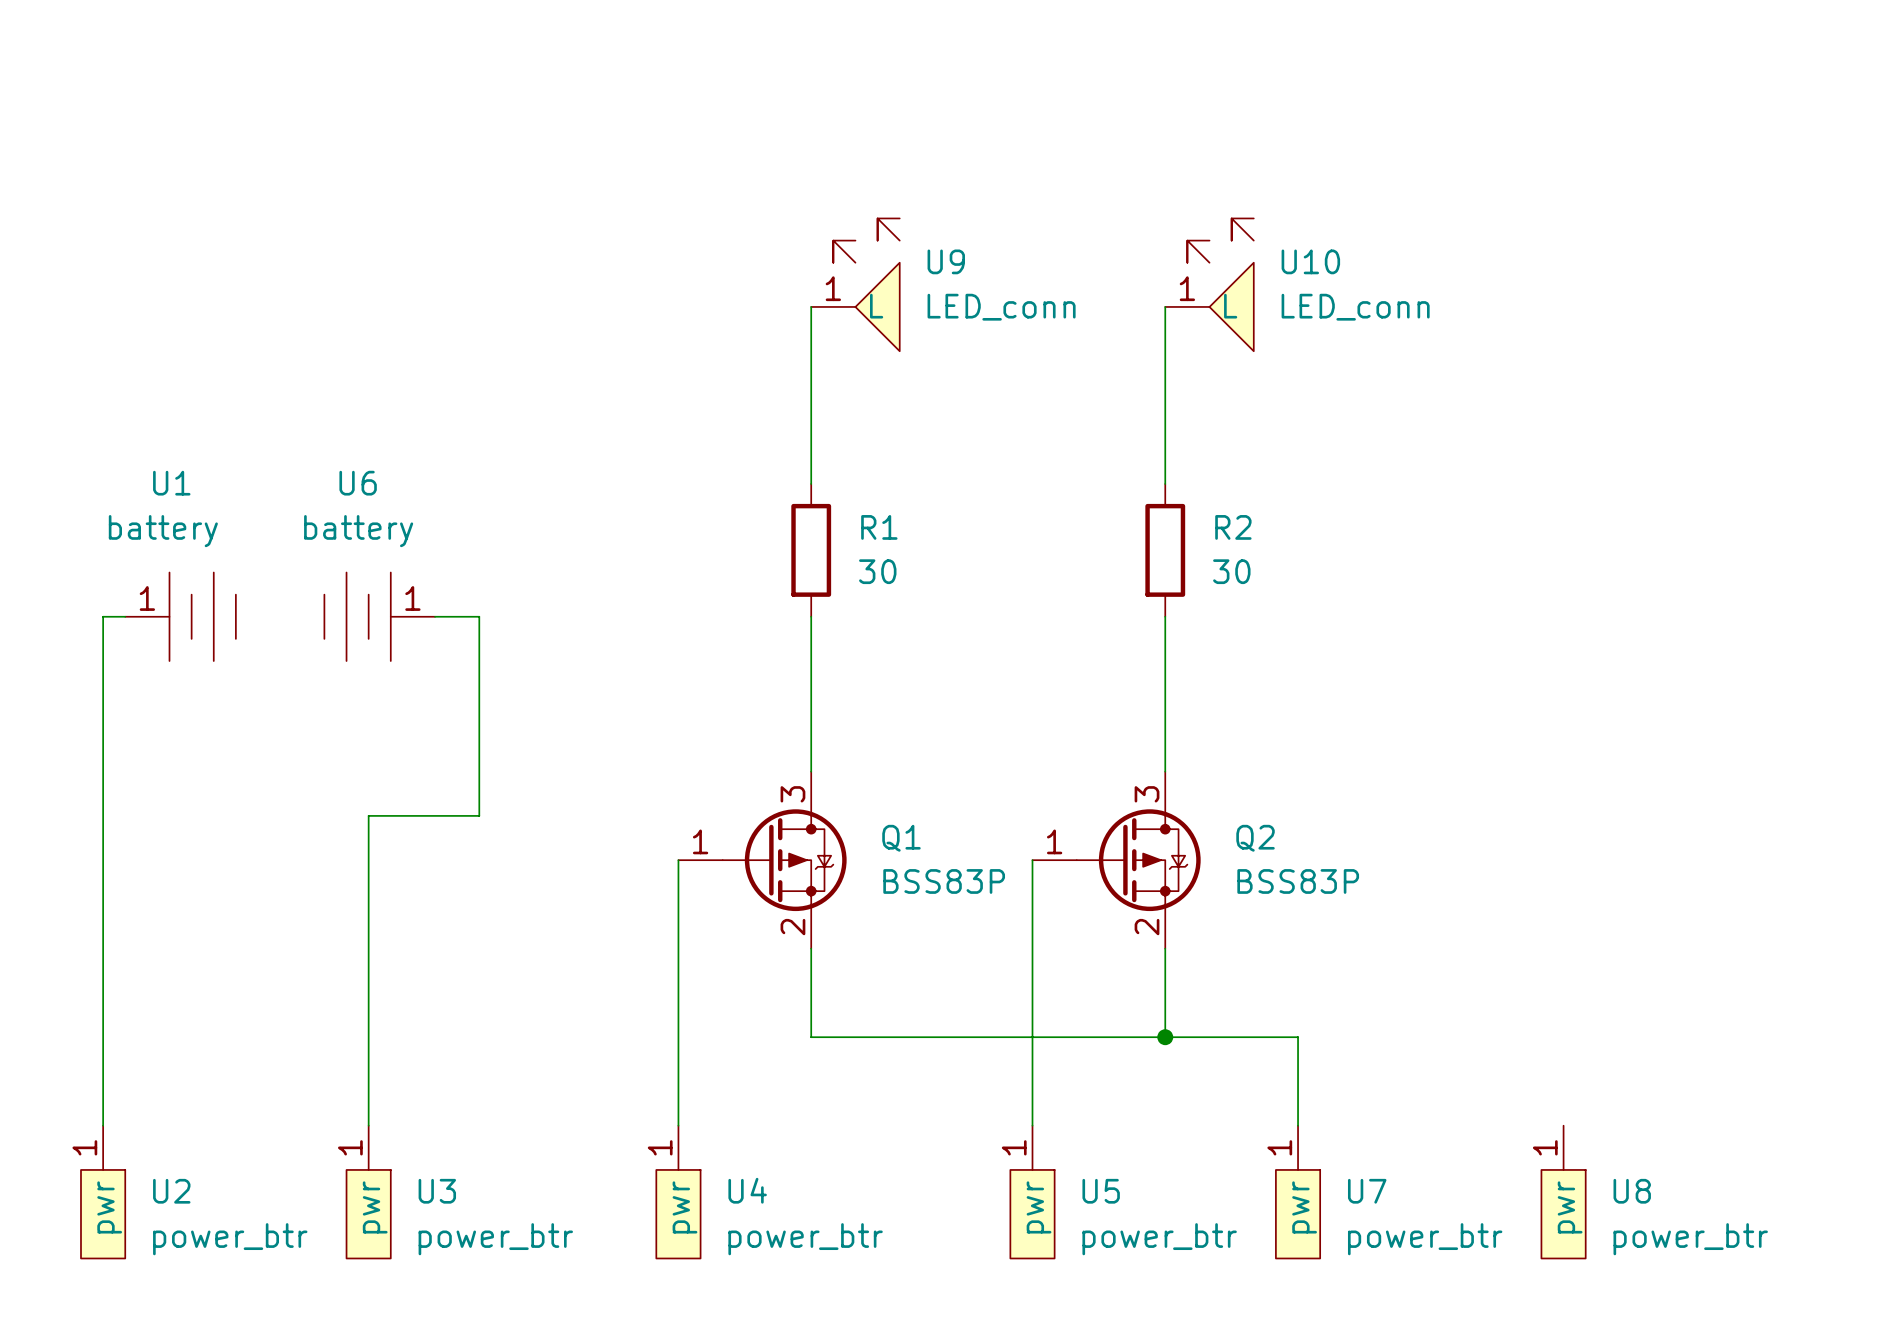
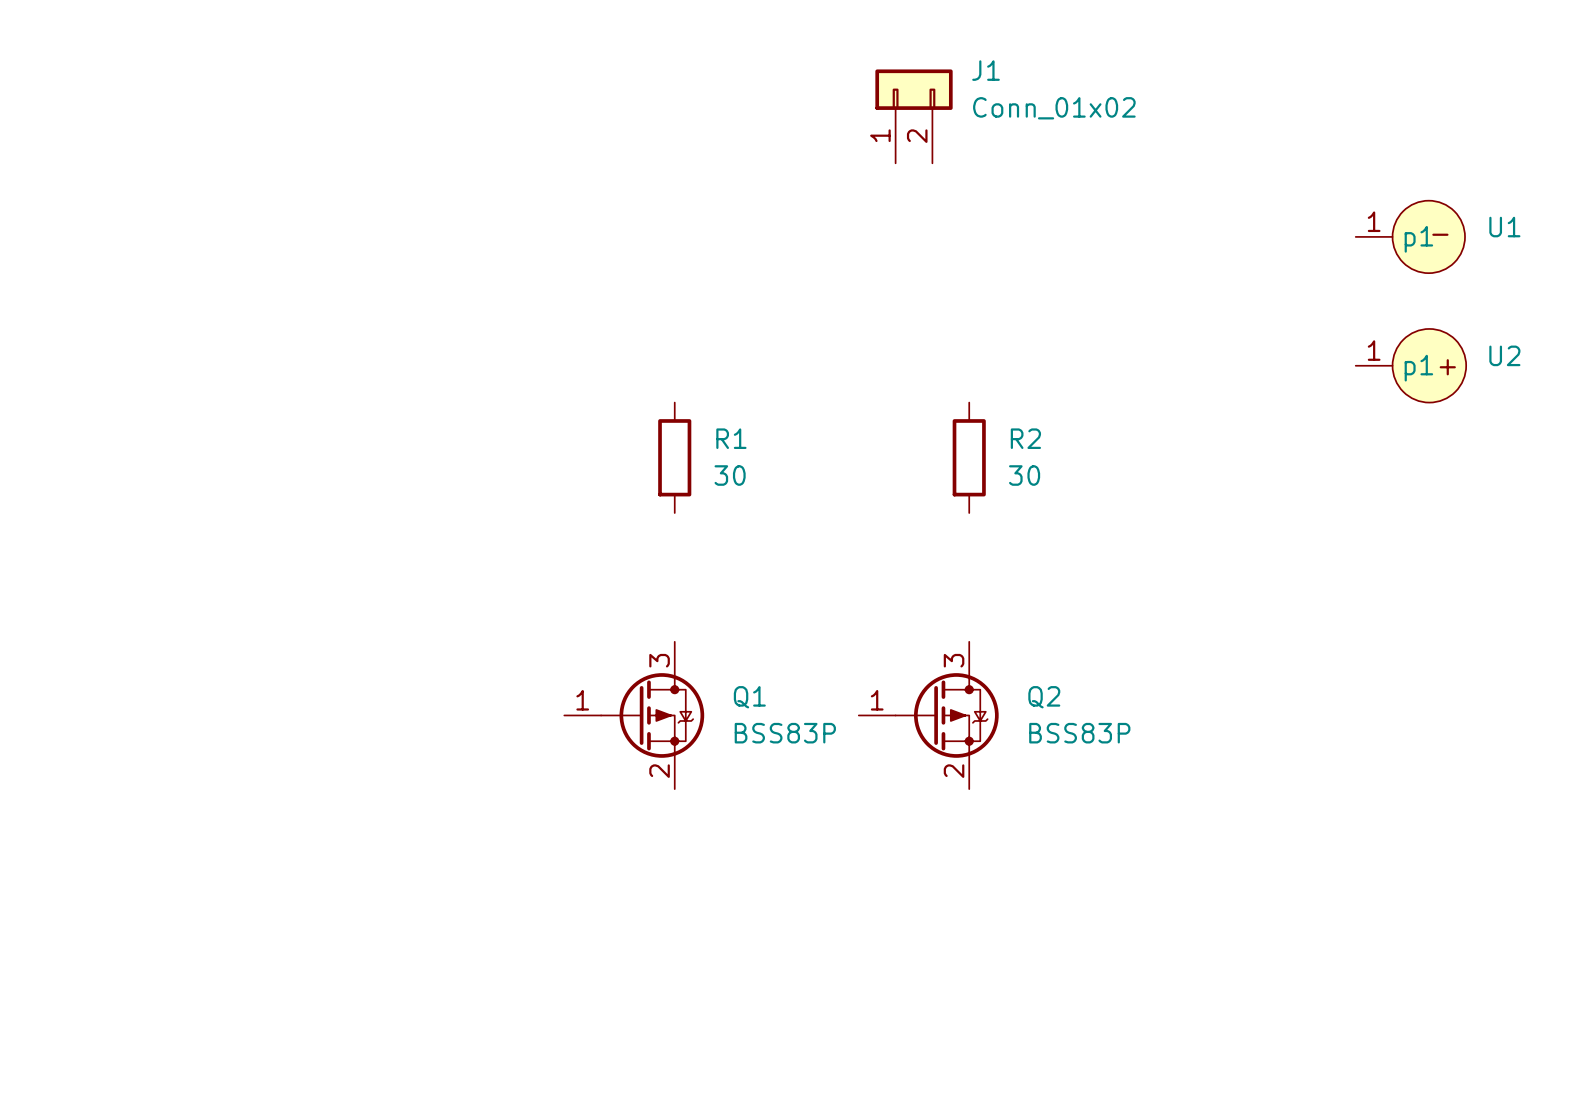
J1: none -> Conn_01x02 (914, 116)
U9: LED_conn (855, 284) -> none
U10: LED_conn (1209, 284) -> none
wire: (811, 306) (811, 484) -> none
wire: (1165, 306) (1165, 484) -> none
U1 name position: U1 (171, 483) -> U1 (1504, 227)
U1 value: battery (163, 531) -> none
U1 symbol: [125, 572, 236, 662] -> [1355, 200, 1466, 274]
wire: (125, 616) (103, 616) (103, 1125) -> none
U6: battery (379, 616) -> none
wire: (435, 616) (479, 616) (479, 815) (368, 815) (368, 1125) -> none
wire: (811, 616) (811, 771) -> none
wire: (1165, 616) (1165, 771) -> none
wire: (678, 860) (678, 1125) -> none
wire: (1032, 860) (1032, 1125) -> none
wire: (811, 948) (811, 1037) (1298, 1037) (1298, 1125) -> none
wire: (1165, 948) (1165, 1037) -> none
junction: (1165, 1037) -> none
U2 symbol: [80, 1125, 126, 1259] -> [1355, 328, 1467, 403]
U2 name position: U2 (171, 1191) -> U2 (1504, 355)
U3: power_btr (368, 1192) -> none
U4: power_btr (678, 1192) -> none
U5: power_btr (1032, 1192) -> none
U7: power_btr (1298, 1192) -> none
U8: power_btr (1563, 1192) -> none
U2 value: power_btr (230, 1239) -> none

